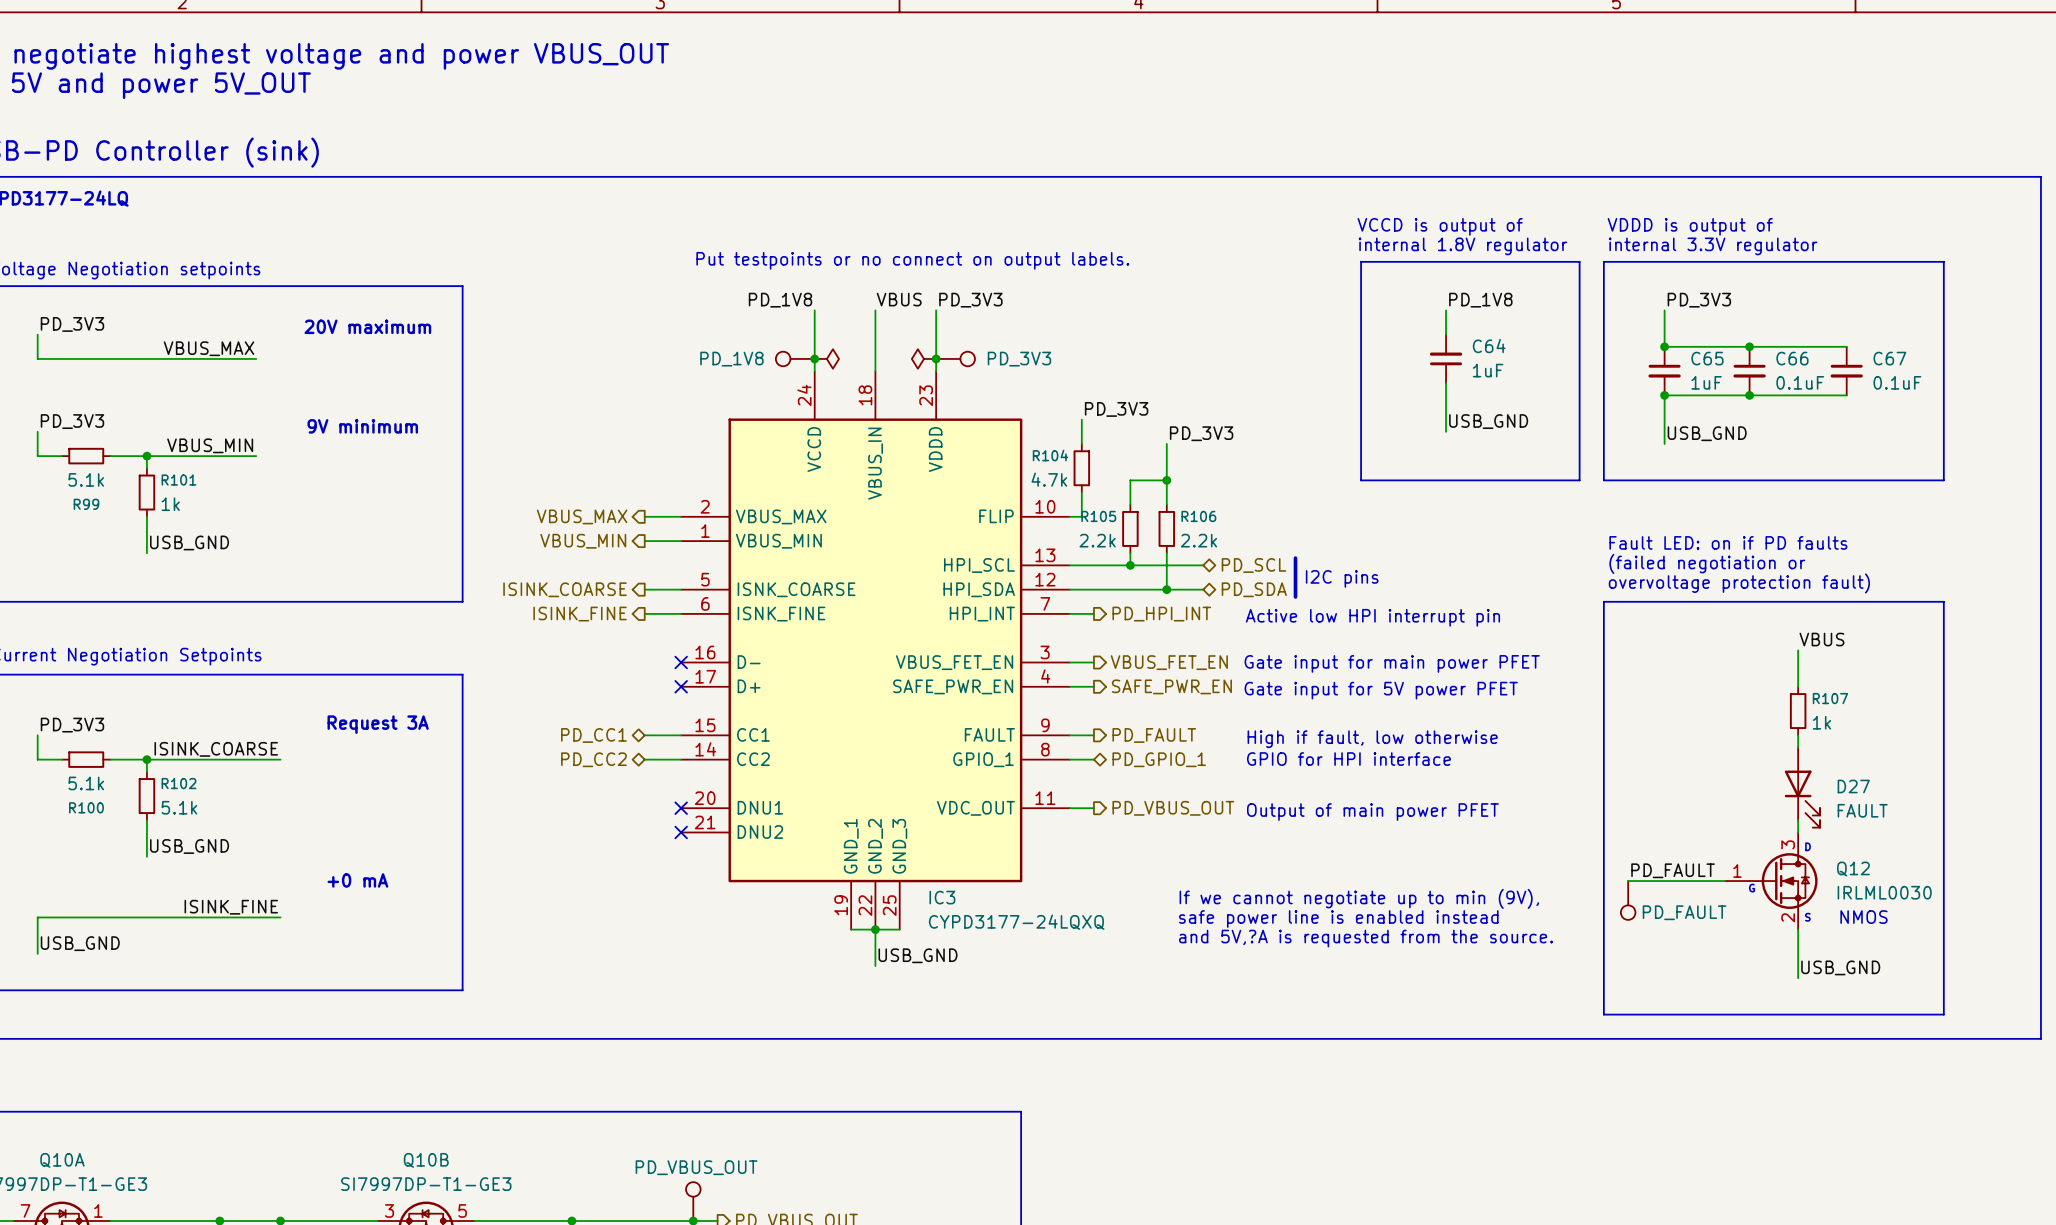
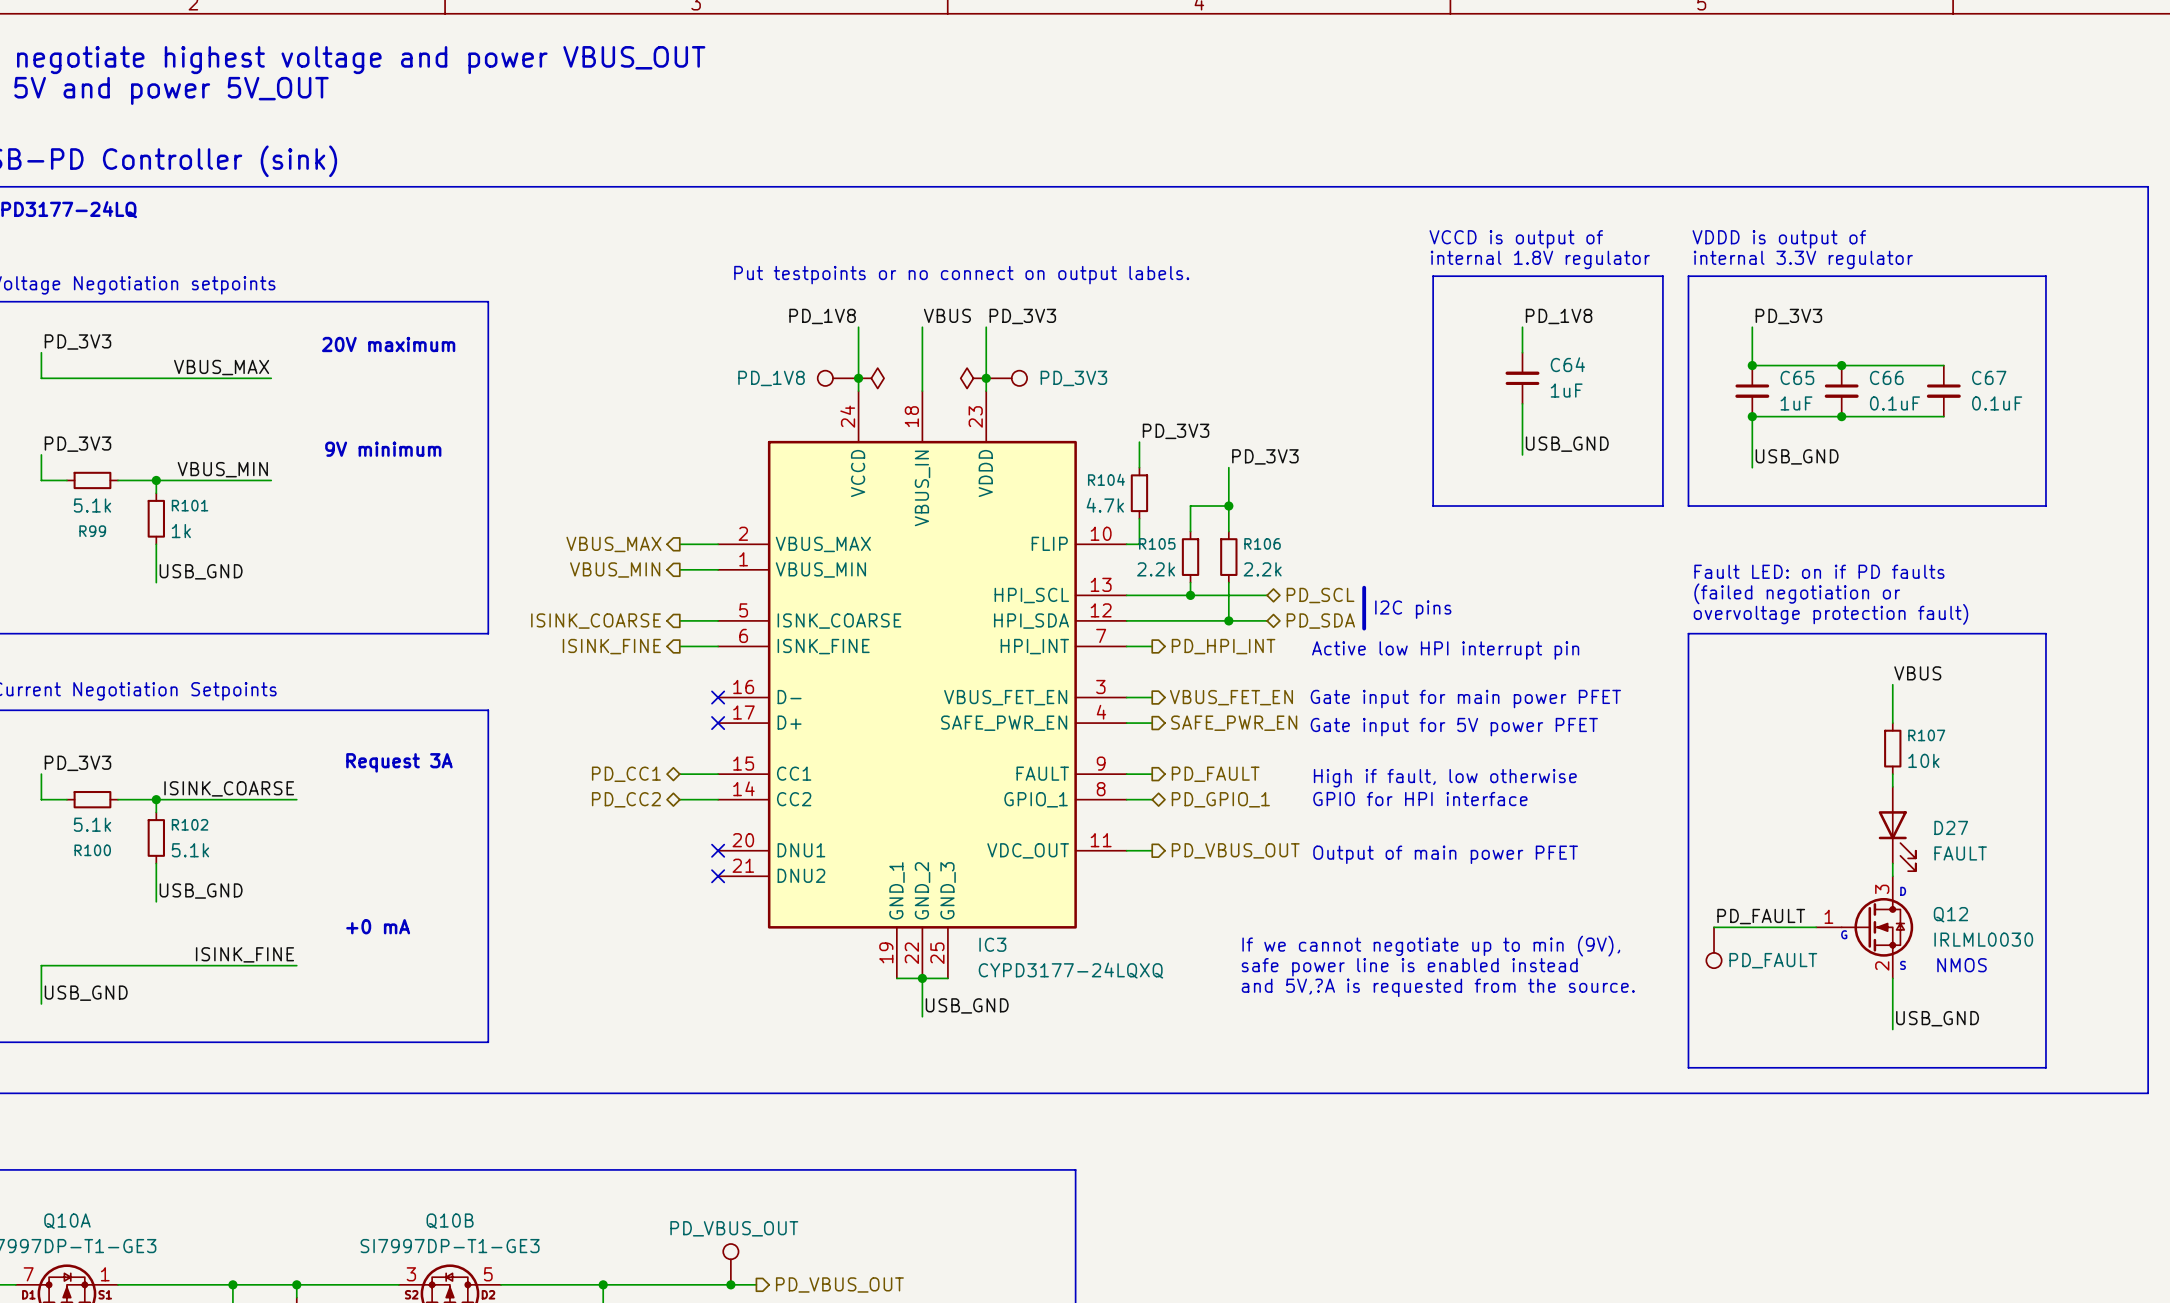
R107 value: 1k (1821, 722) -> 10k (1923, 760)

